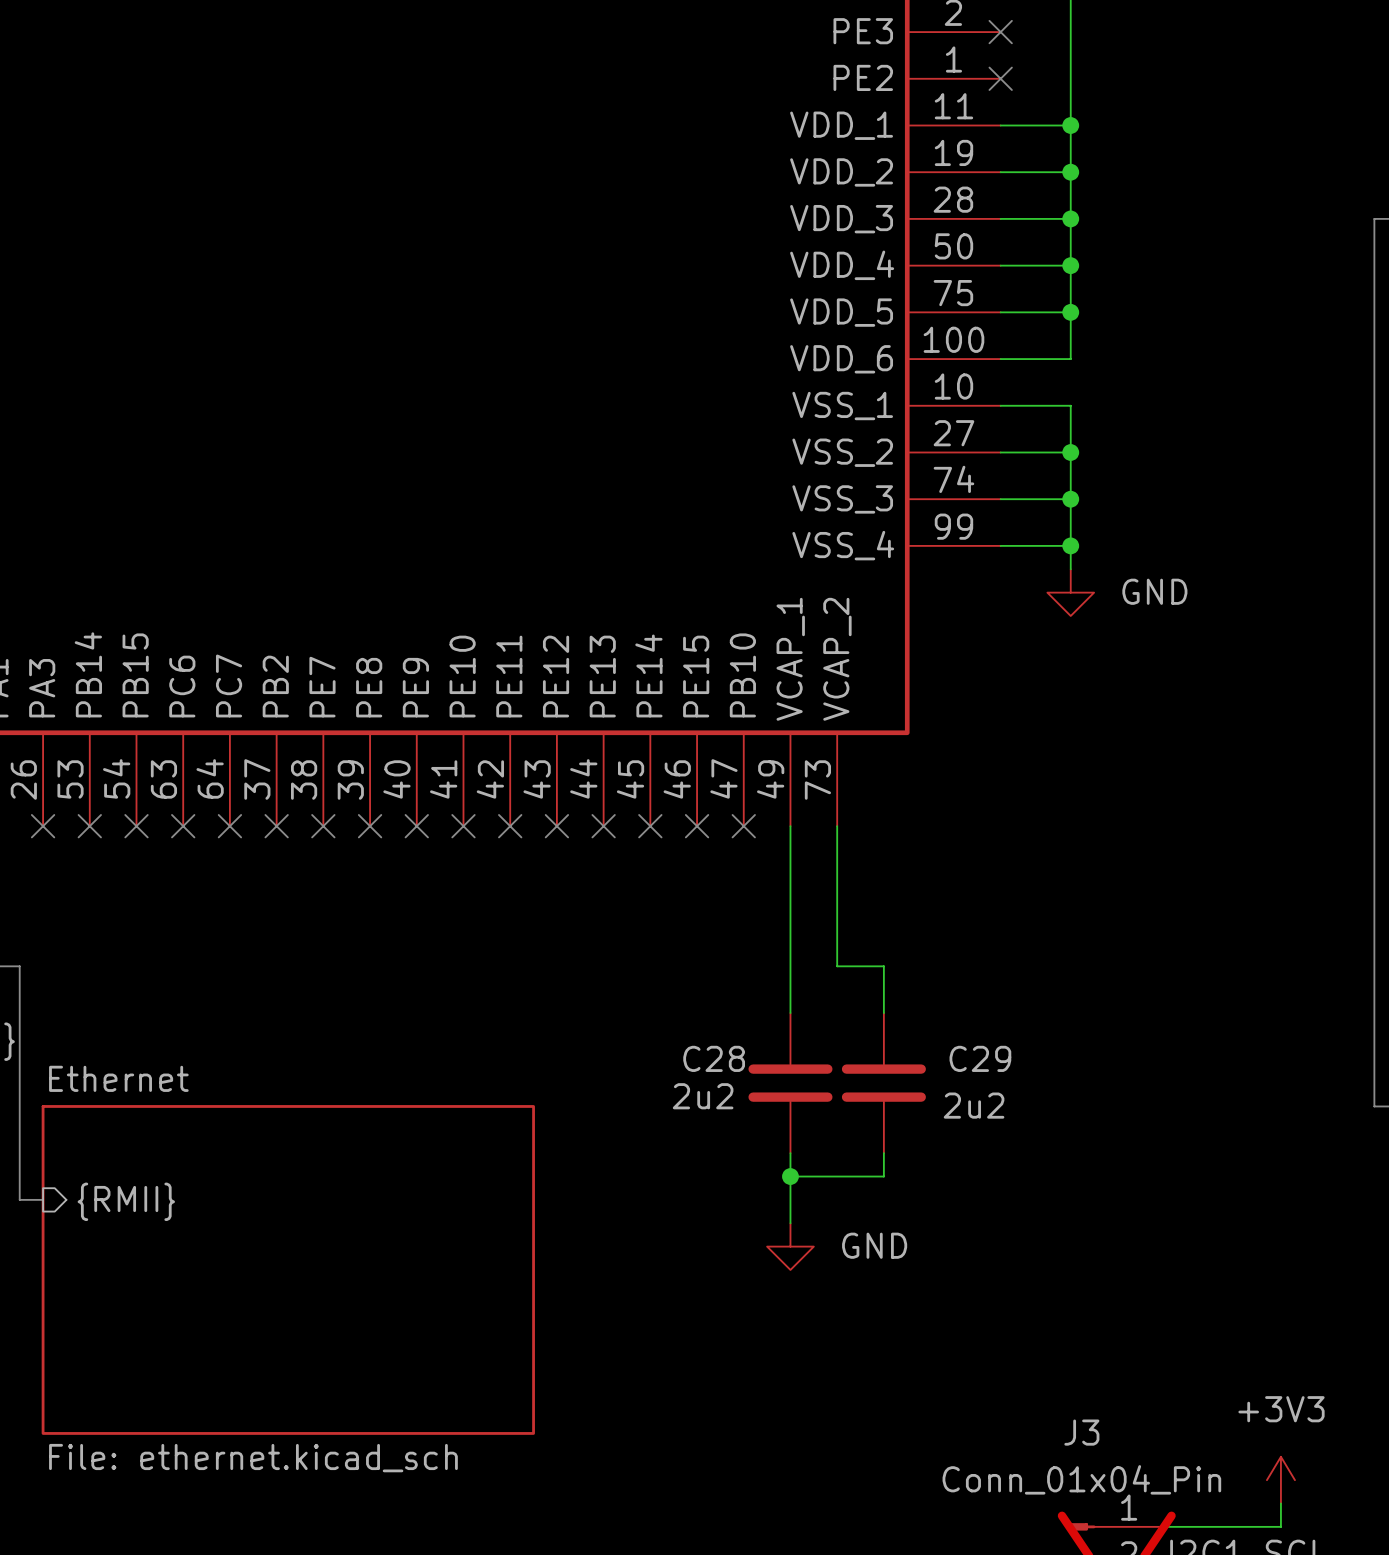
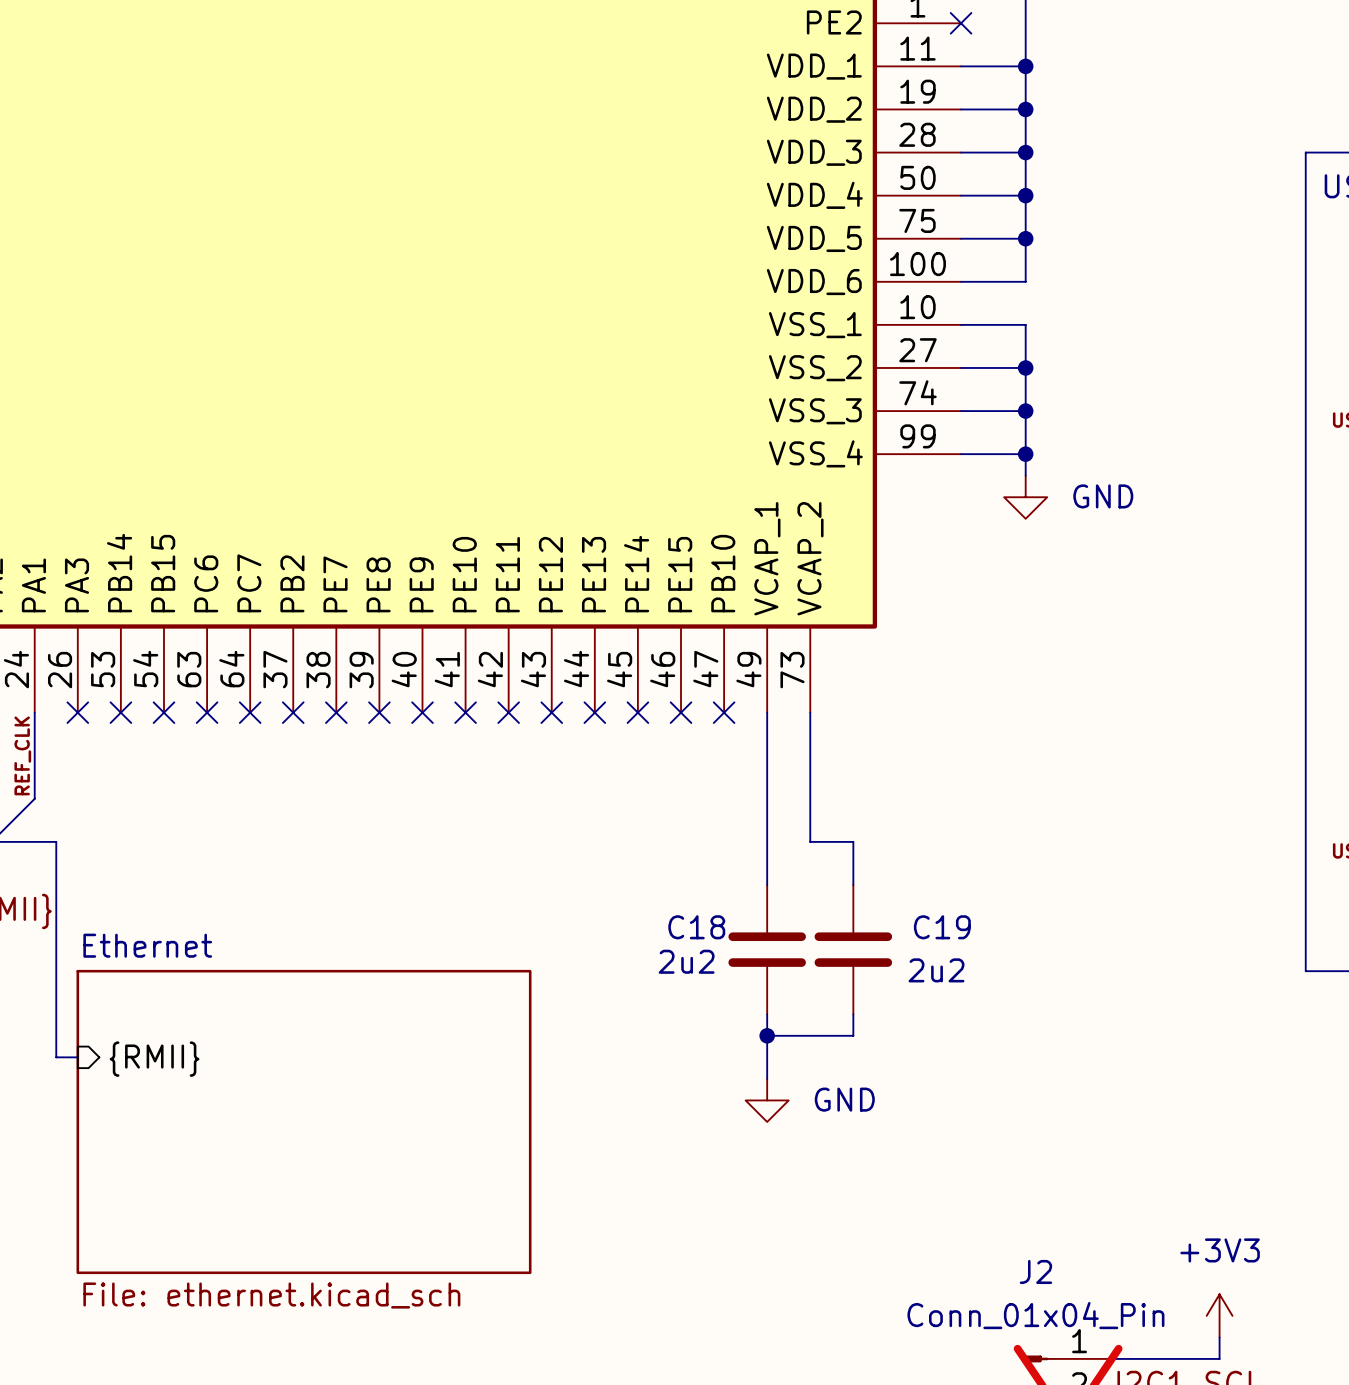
C28 name: C28 (714, 1058) -> C18 (696, 927)
C29 name: C29 (980, 1058) -> C19 (942, 927)
J3 name: J3 (1081, 1432) -> J2 (1035, 1271)

